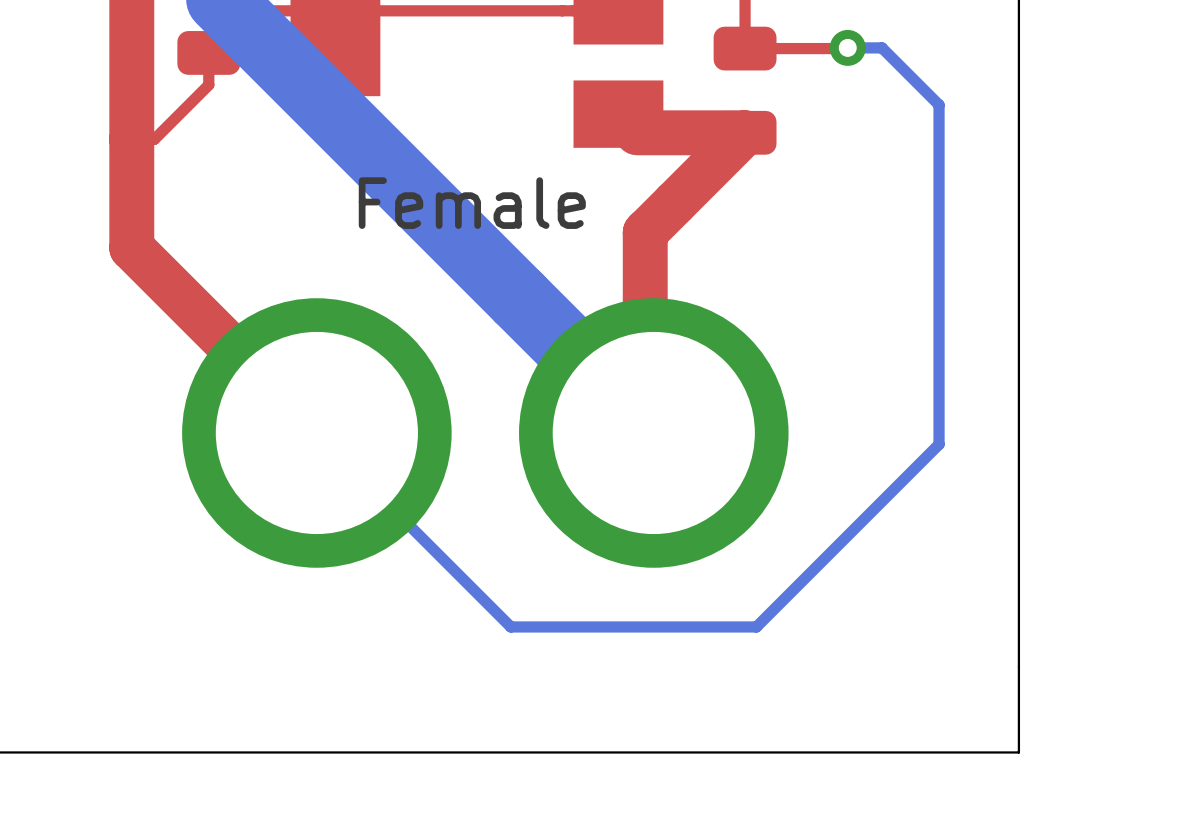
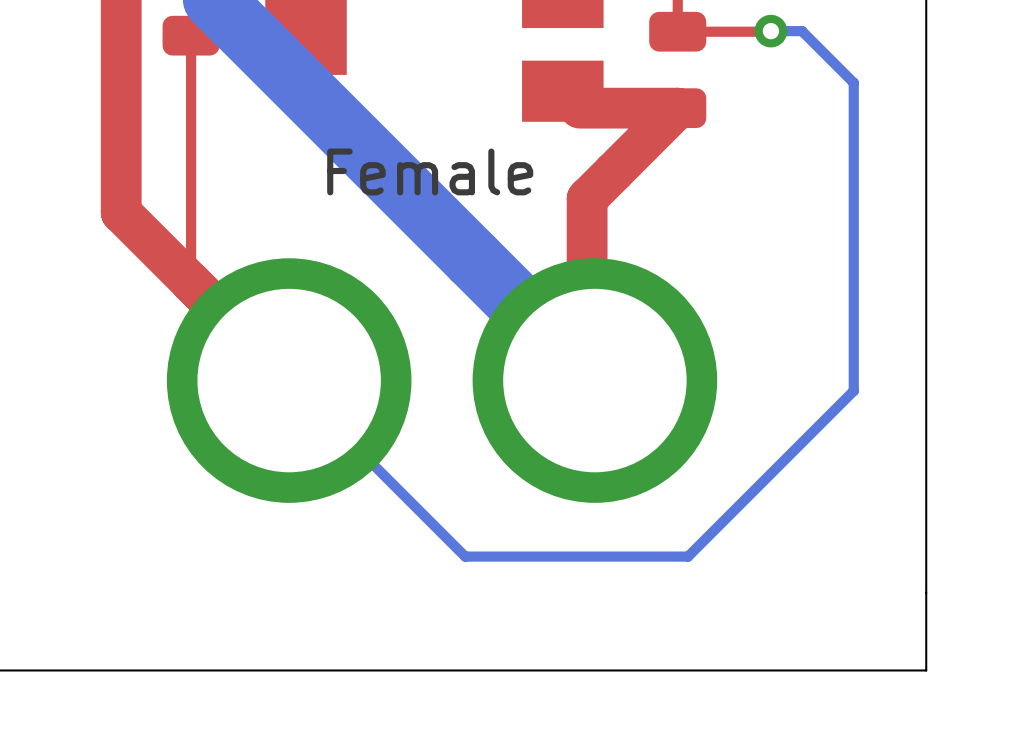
top track: (208, 84) (154, 139) (131, 139) -> (191, 64) (191, 282)

